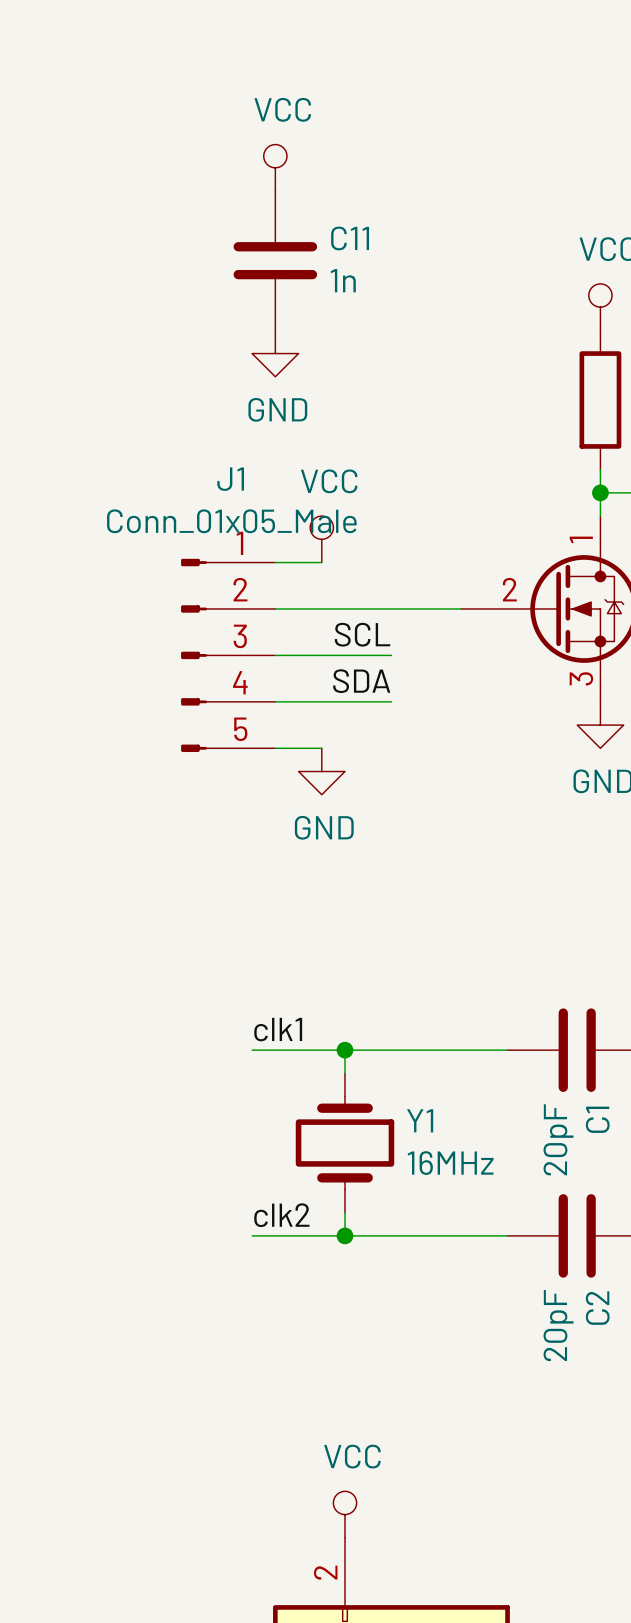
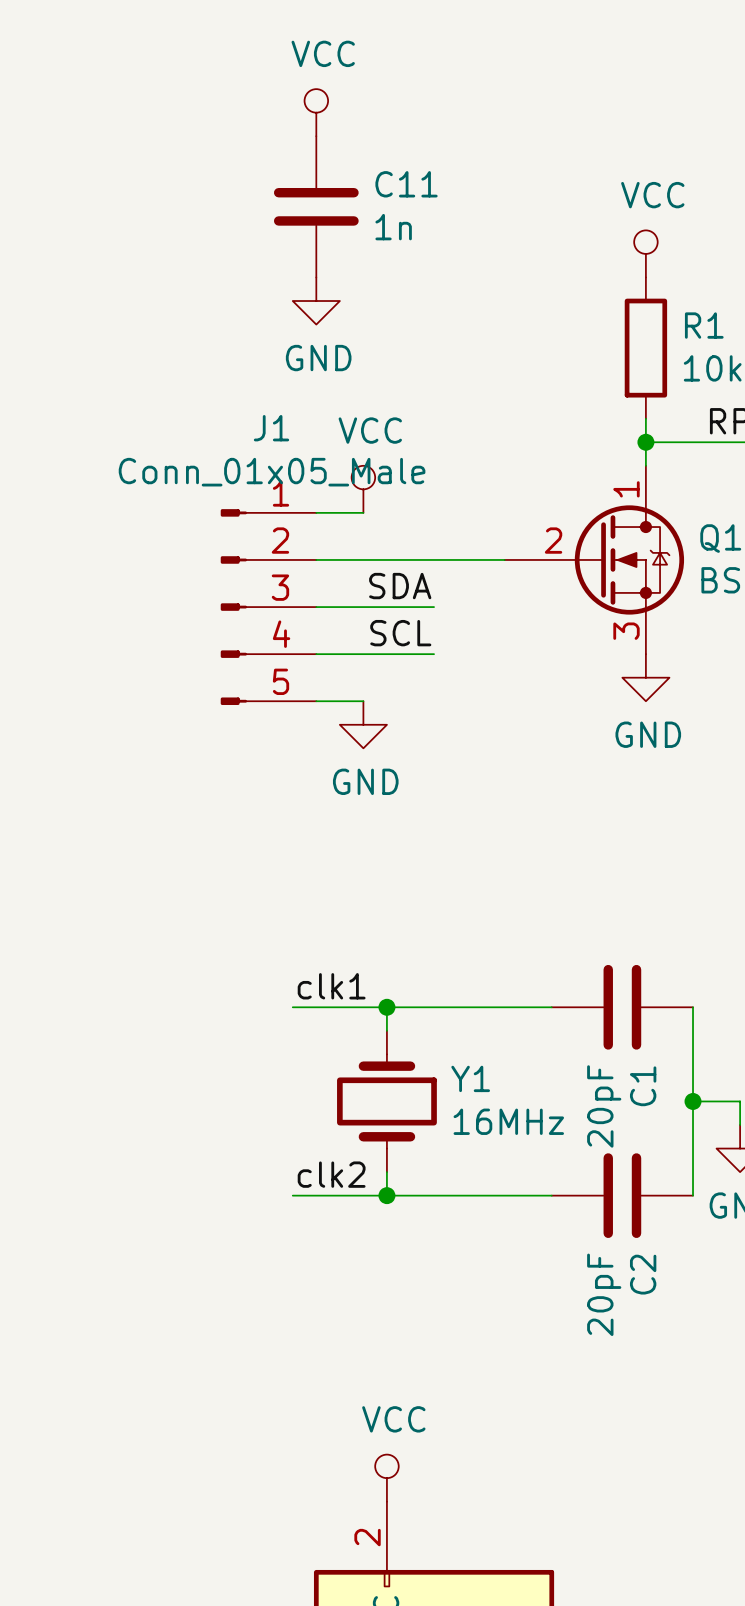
label: SCL (362, 634) -> SDA (400, 586)
label: SDA (361, 681) -> SCL (400, 633)

